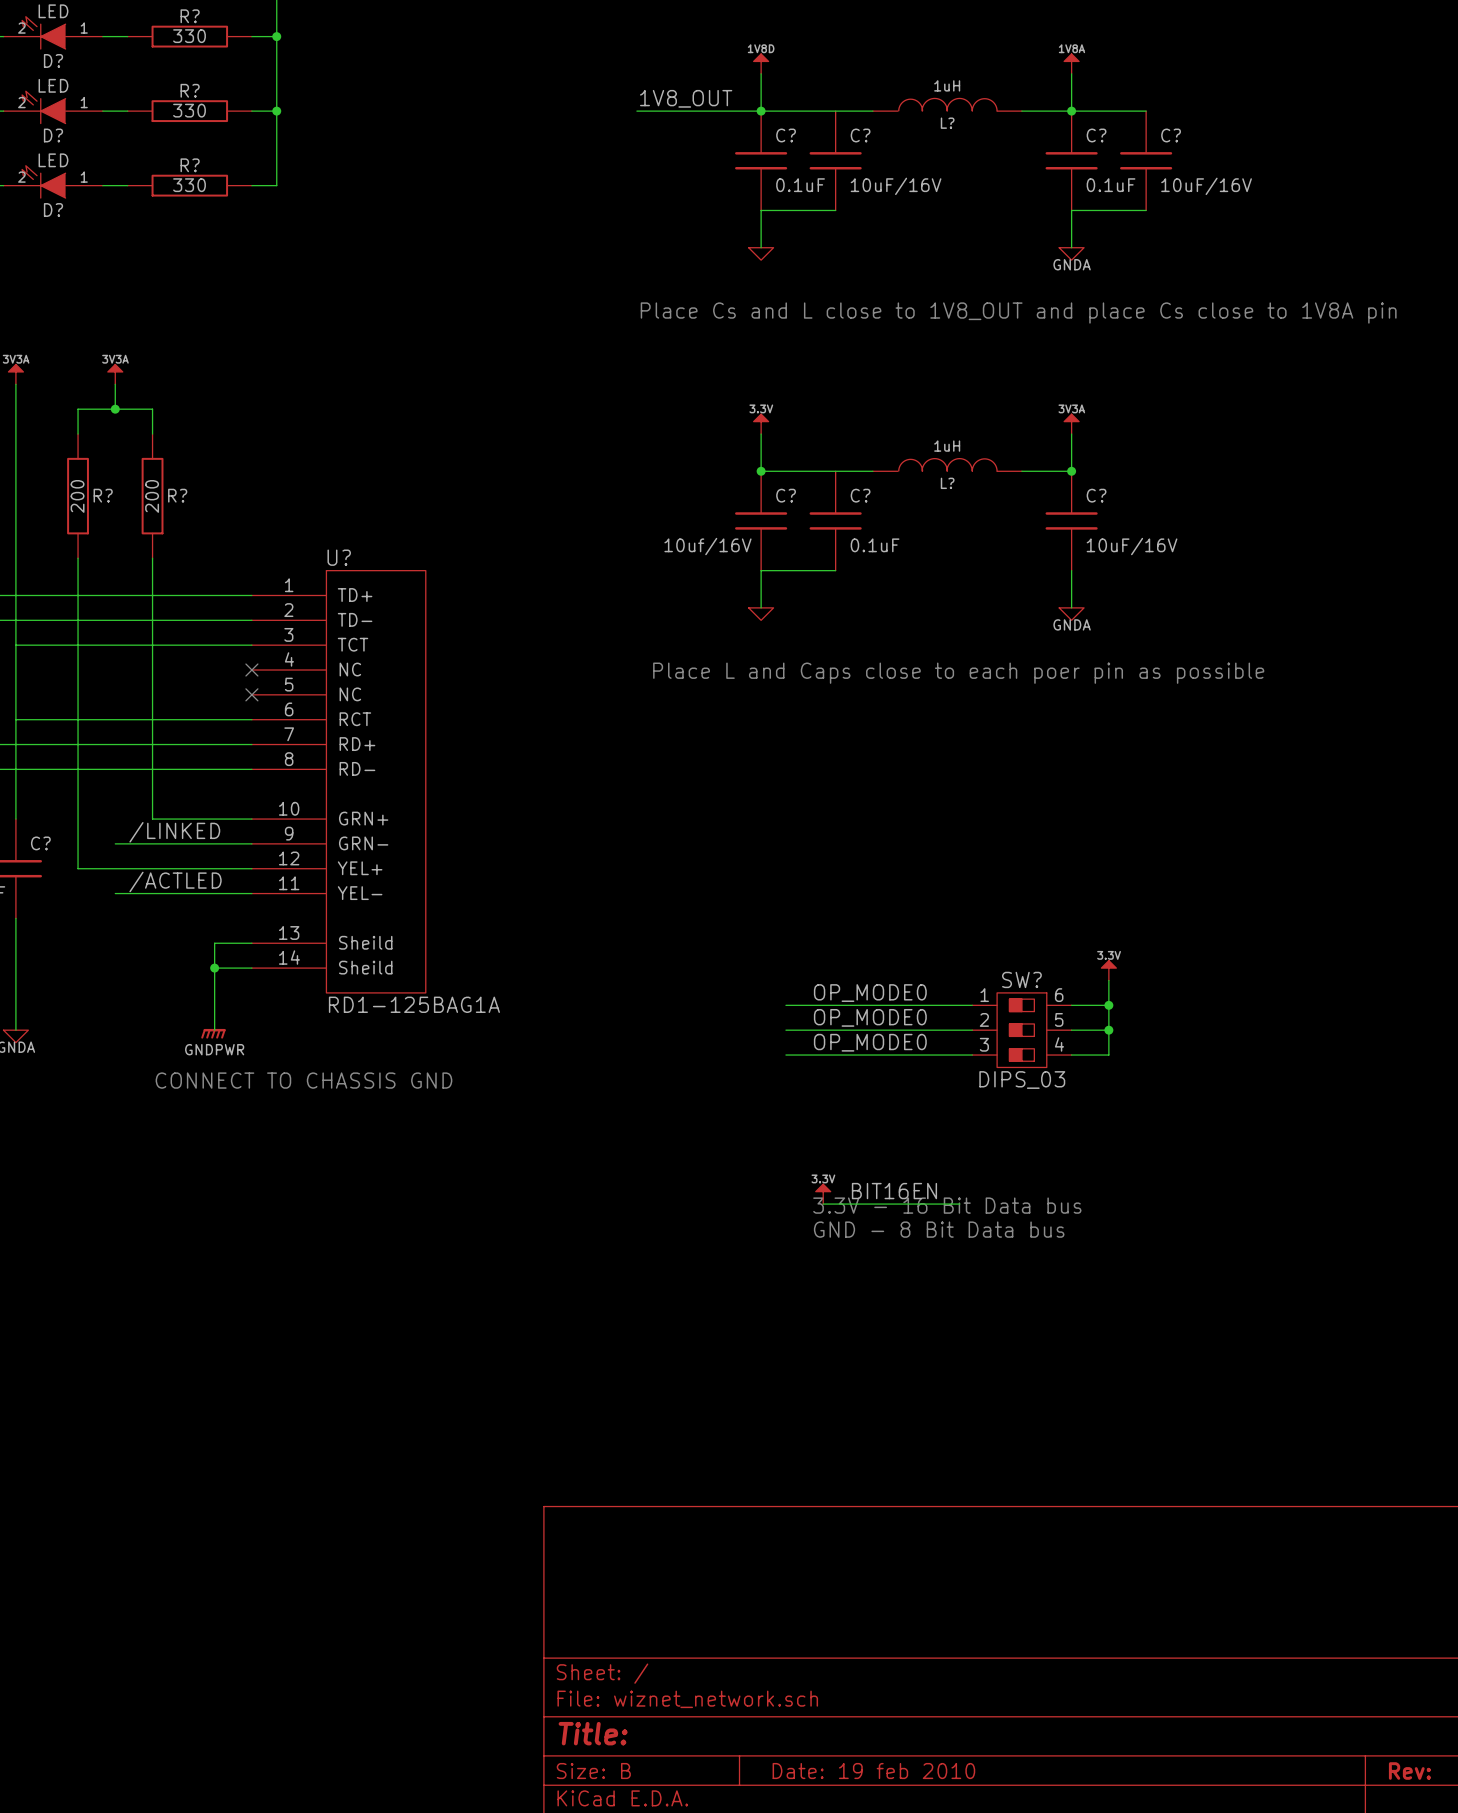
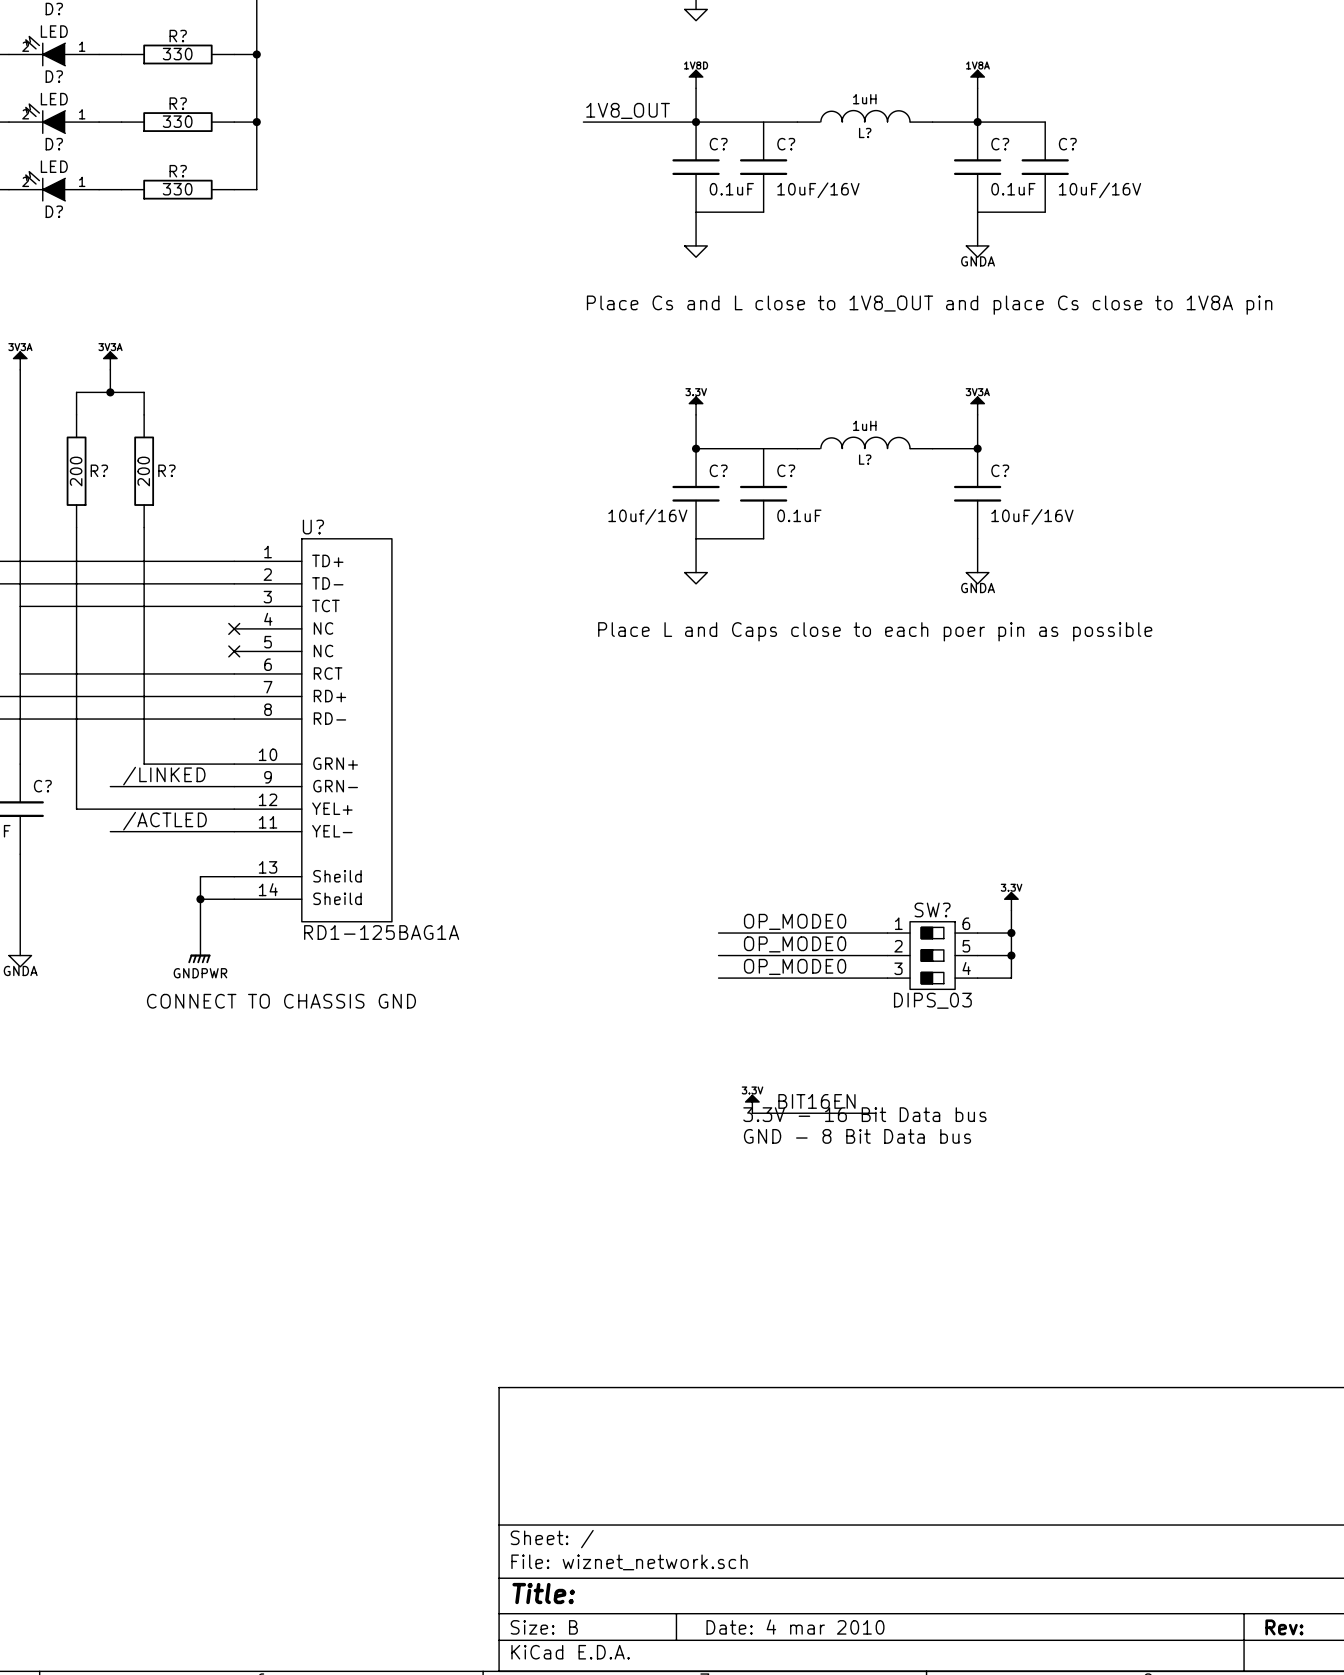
title block: Date: 19 feb 2010 (873, 1771) -> Date: 4 mar 2010 (795, 1627)

